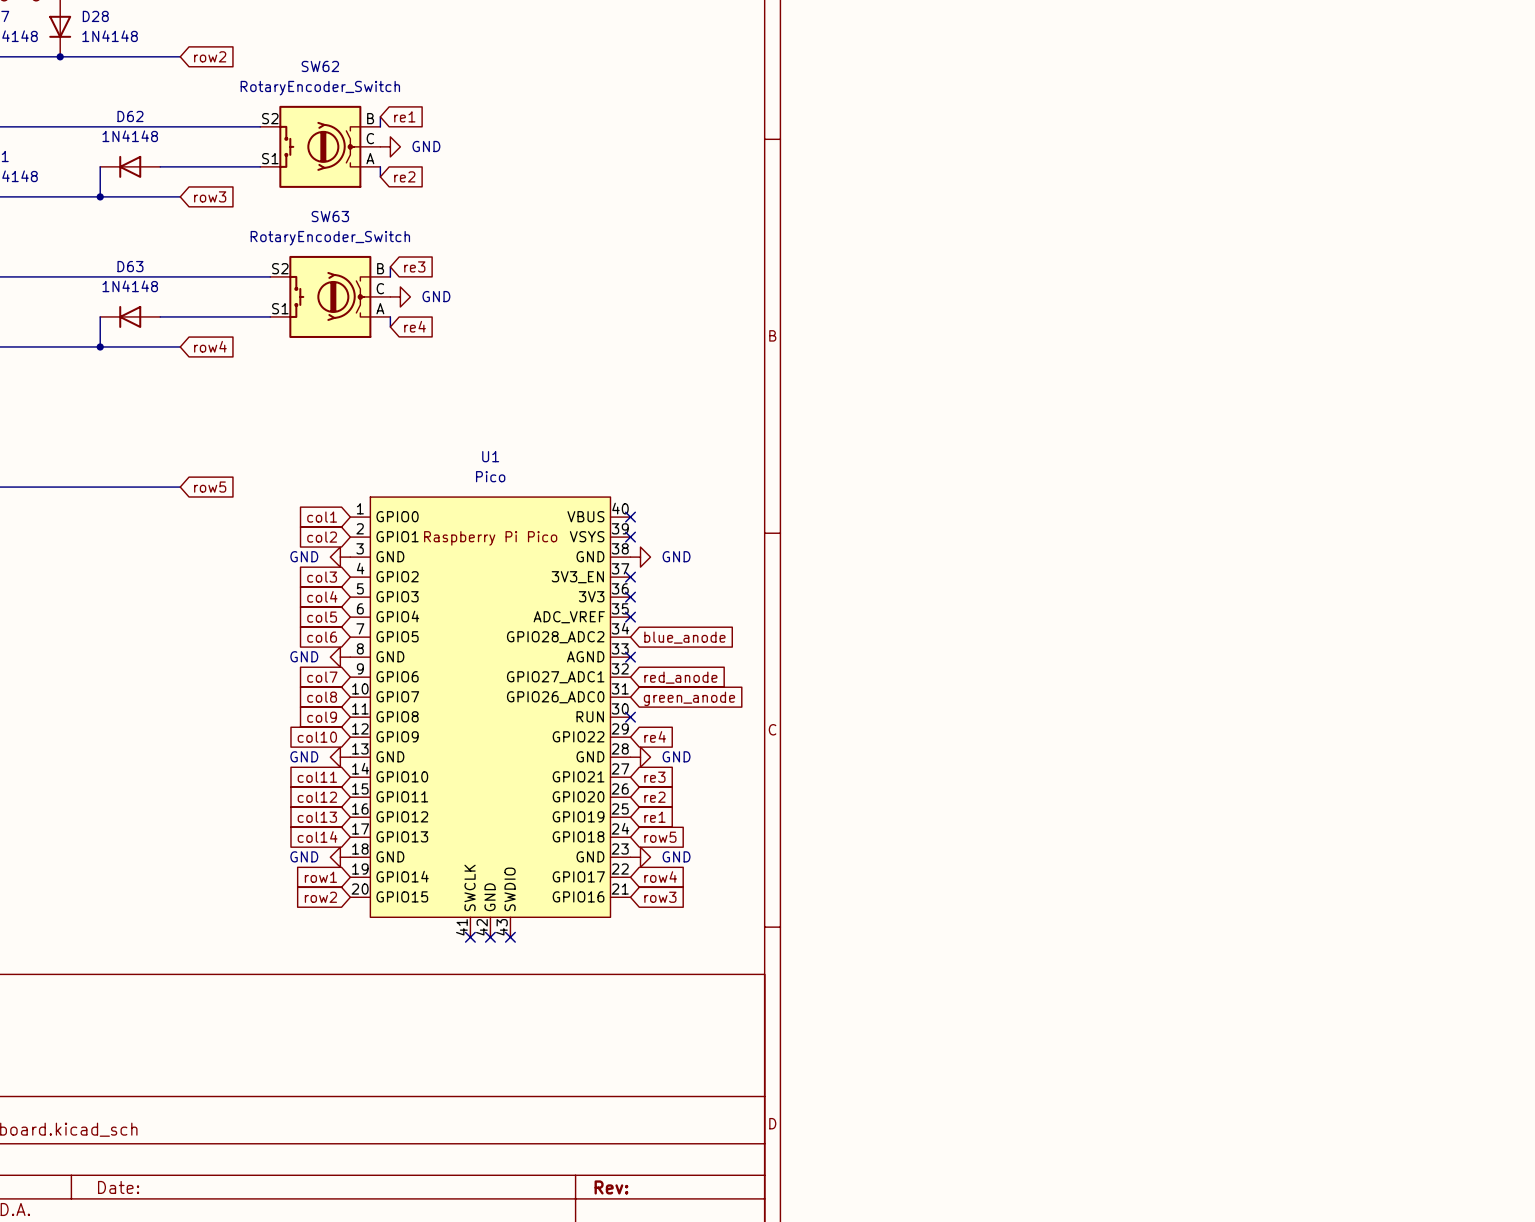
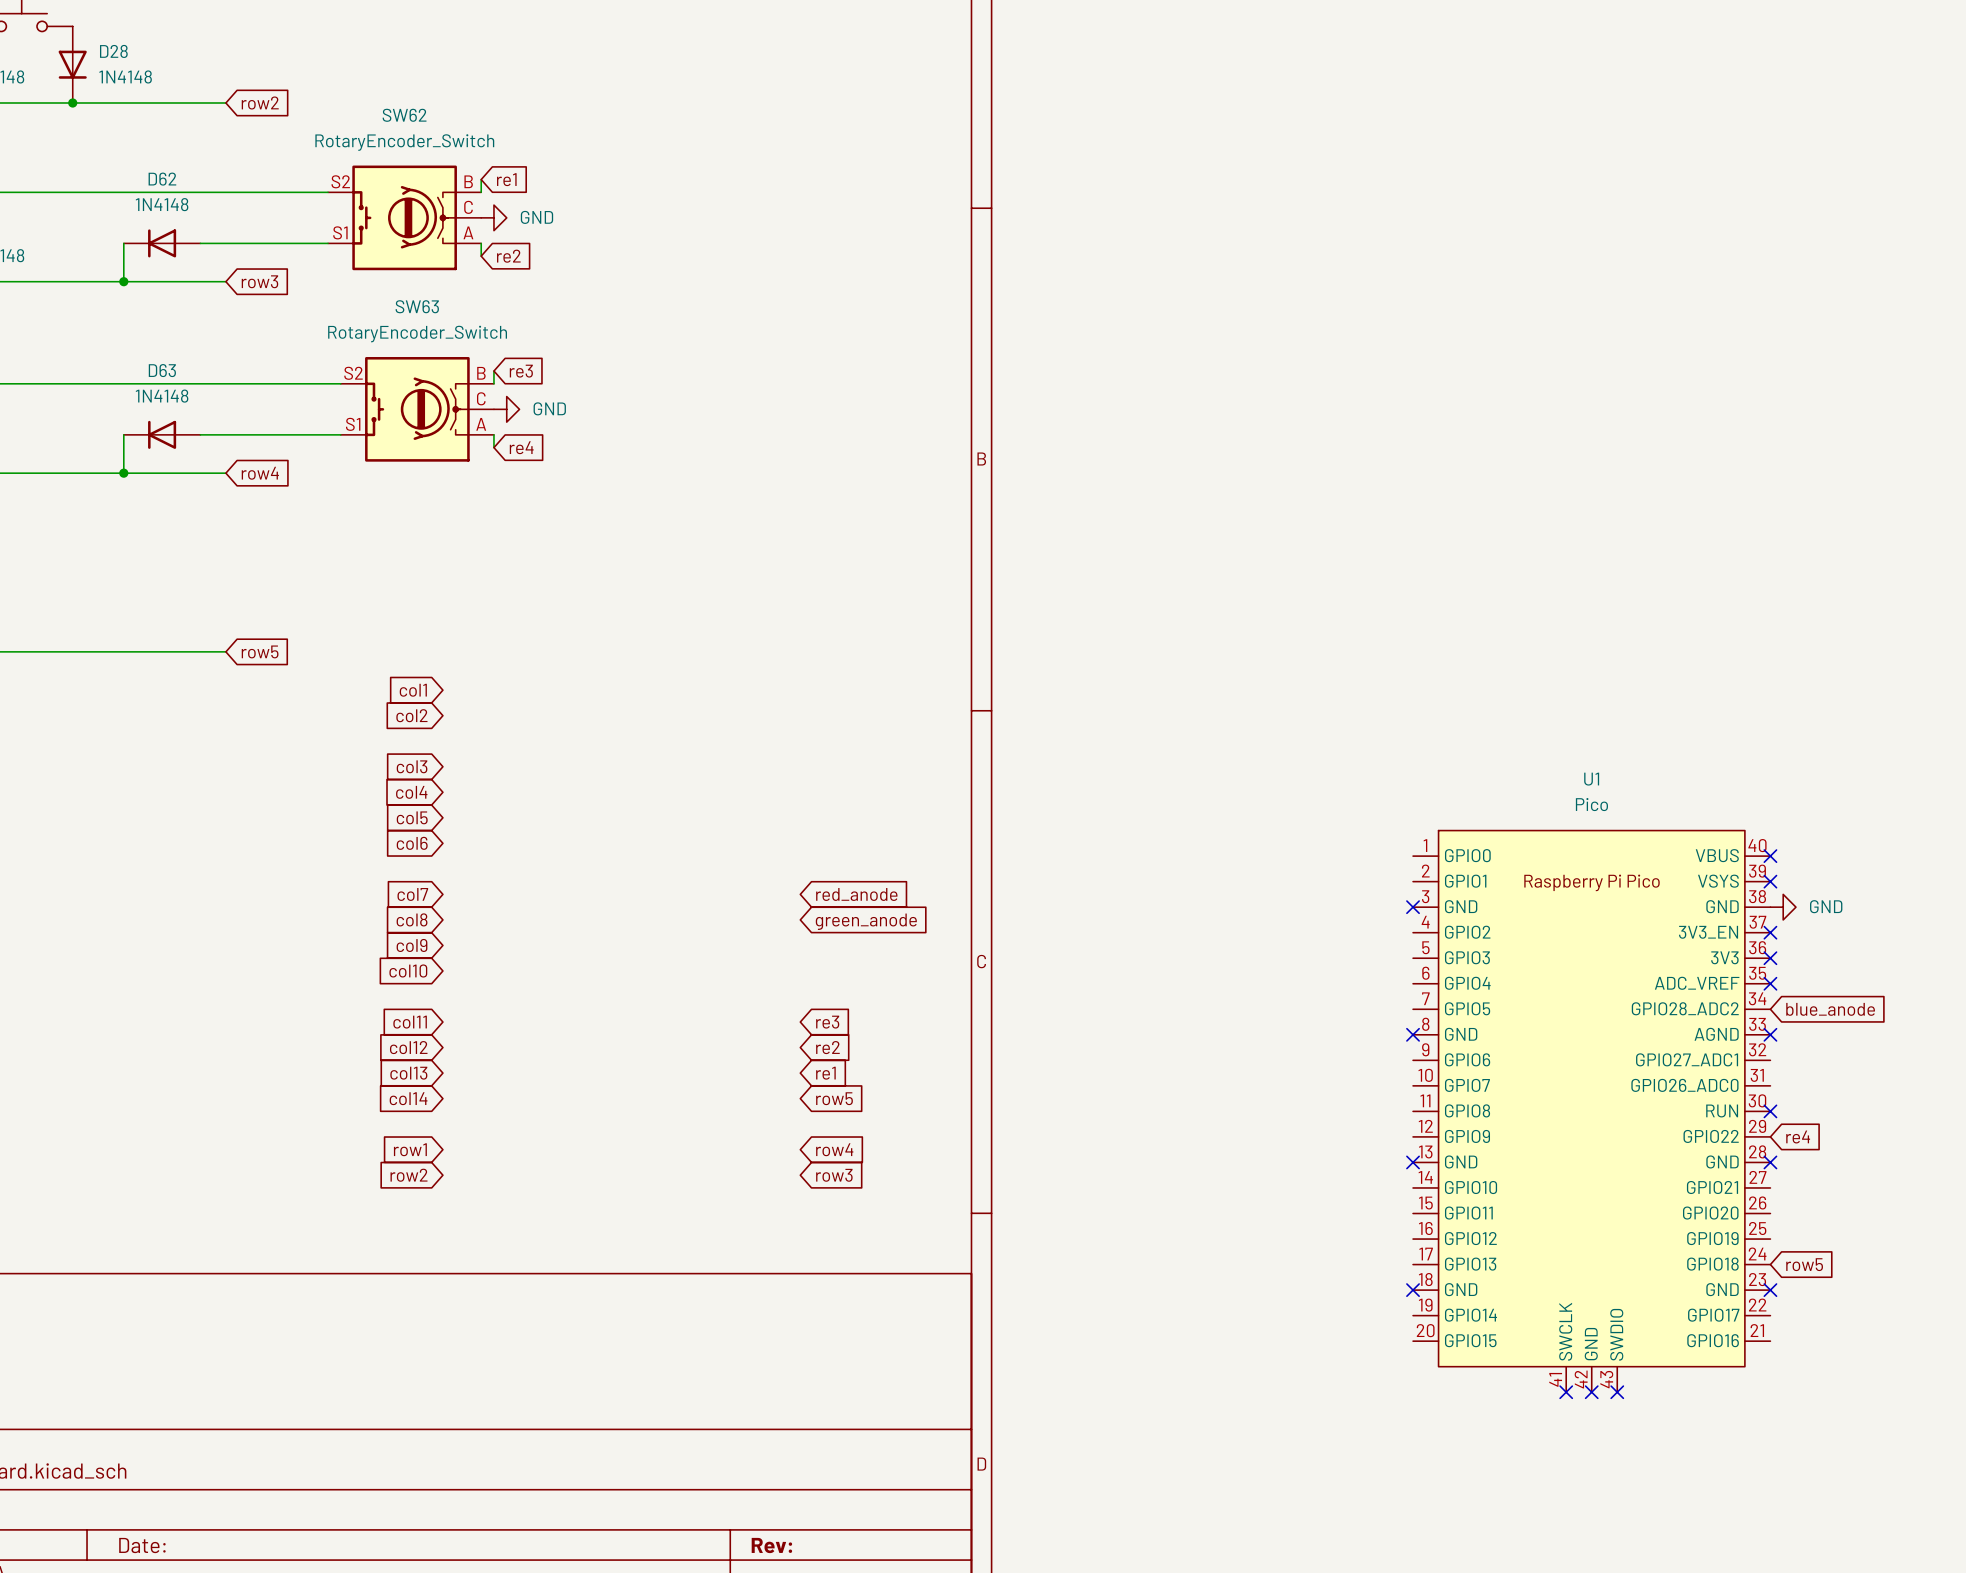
no-connect mark: (630, 517) -> none
no-connect mark: (630, 537) -> none
power symbol: GND (340, 557) -> none
power symbol: GND (640, 557) -> none
no-connect mark: (630, 577) -> none
no-connect mark: (630, 597) -> none
no-connect mark: (630, 617) -> none
global label: blue_anode (684, 637) -> none
no-connect mark: none -> (1770, 856)
power symbol: GND (340, 657) -> none
no-connect mark: (630, 657) -> none
no-connect mark: none -> (1770, 881)
no-connect mark: none -> (1413, 907)
power symbol: none -> GND (1783, 907)
no-connect mark: none -> (1770, 932)
U1 position: (490, 717) -> (1591, 1111)
no-connect mark: (630, 717) -> none
no-connect mark: none -> (1770, 958)
global label: re4 (655, 736) -> none
no-connect mark: none -> (1770, 983)
power symbol: GND (340, 757) -> none
power symbol: GND (640, 757) -> none
global label: none -> blue_anode (1830, 1009)
no-connect mark: none -> (1413, 1034)
no-connect mark: none -> (1770, 1034)
no-connect mark: none -> (1770, 1111)
power symbol: GND (340, 857) -> none
power symbol: GND (640, 857) -> none
global label: none -> re4 (1798, 1137)
no-connect mark: none -> (1413, 1162)
no-connect mark: none -> (1770, 1162)
no-connect mark: (470, 937) -> none
no-connect mark: (490, 937) -> none
no-connect mark: (510, 937) -> none
global label: none -> row5 (1804, 1264)
no-connect mark: none -> (1413, 1290)
no-connect mark: none -> (1770, 1290)
no-connect mark: none -> (1566, 1392)
no-connect mark: none -> (1591, 1392)
no-connect mark: none -> (1617, 1392)

